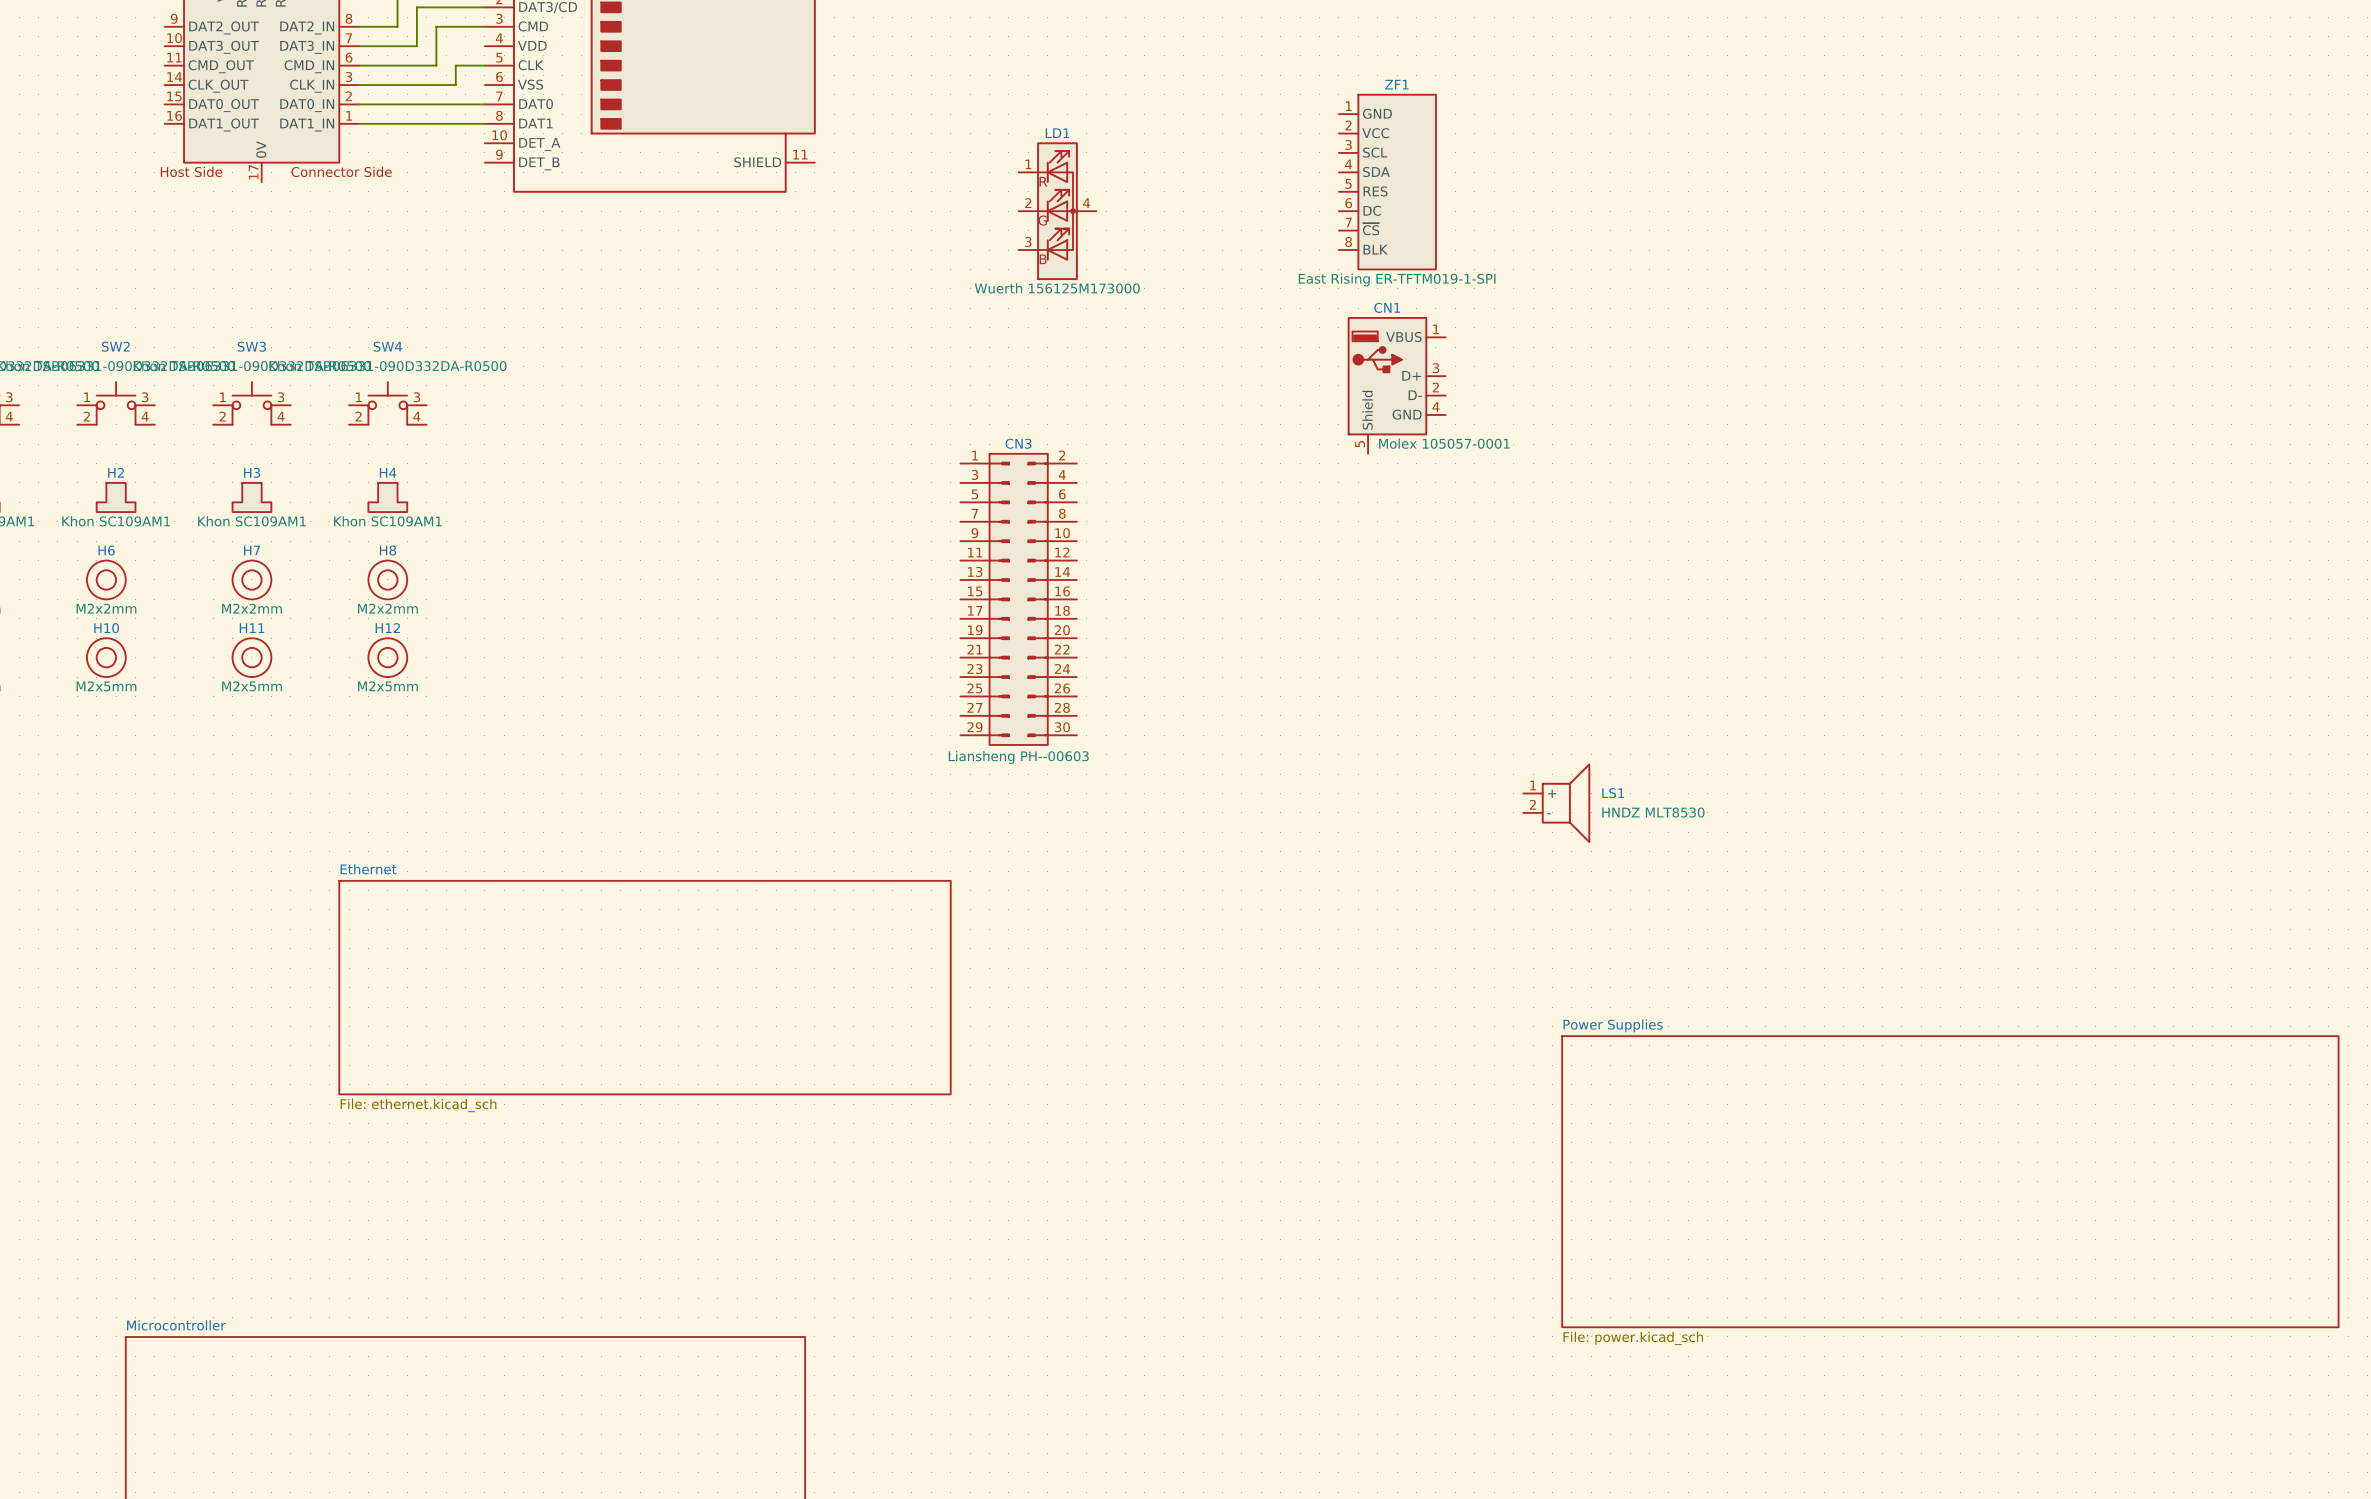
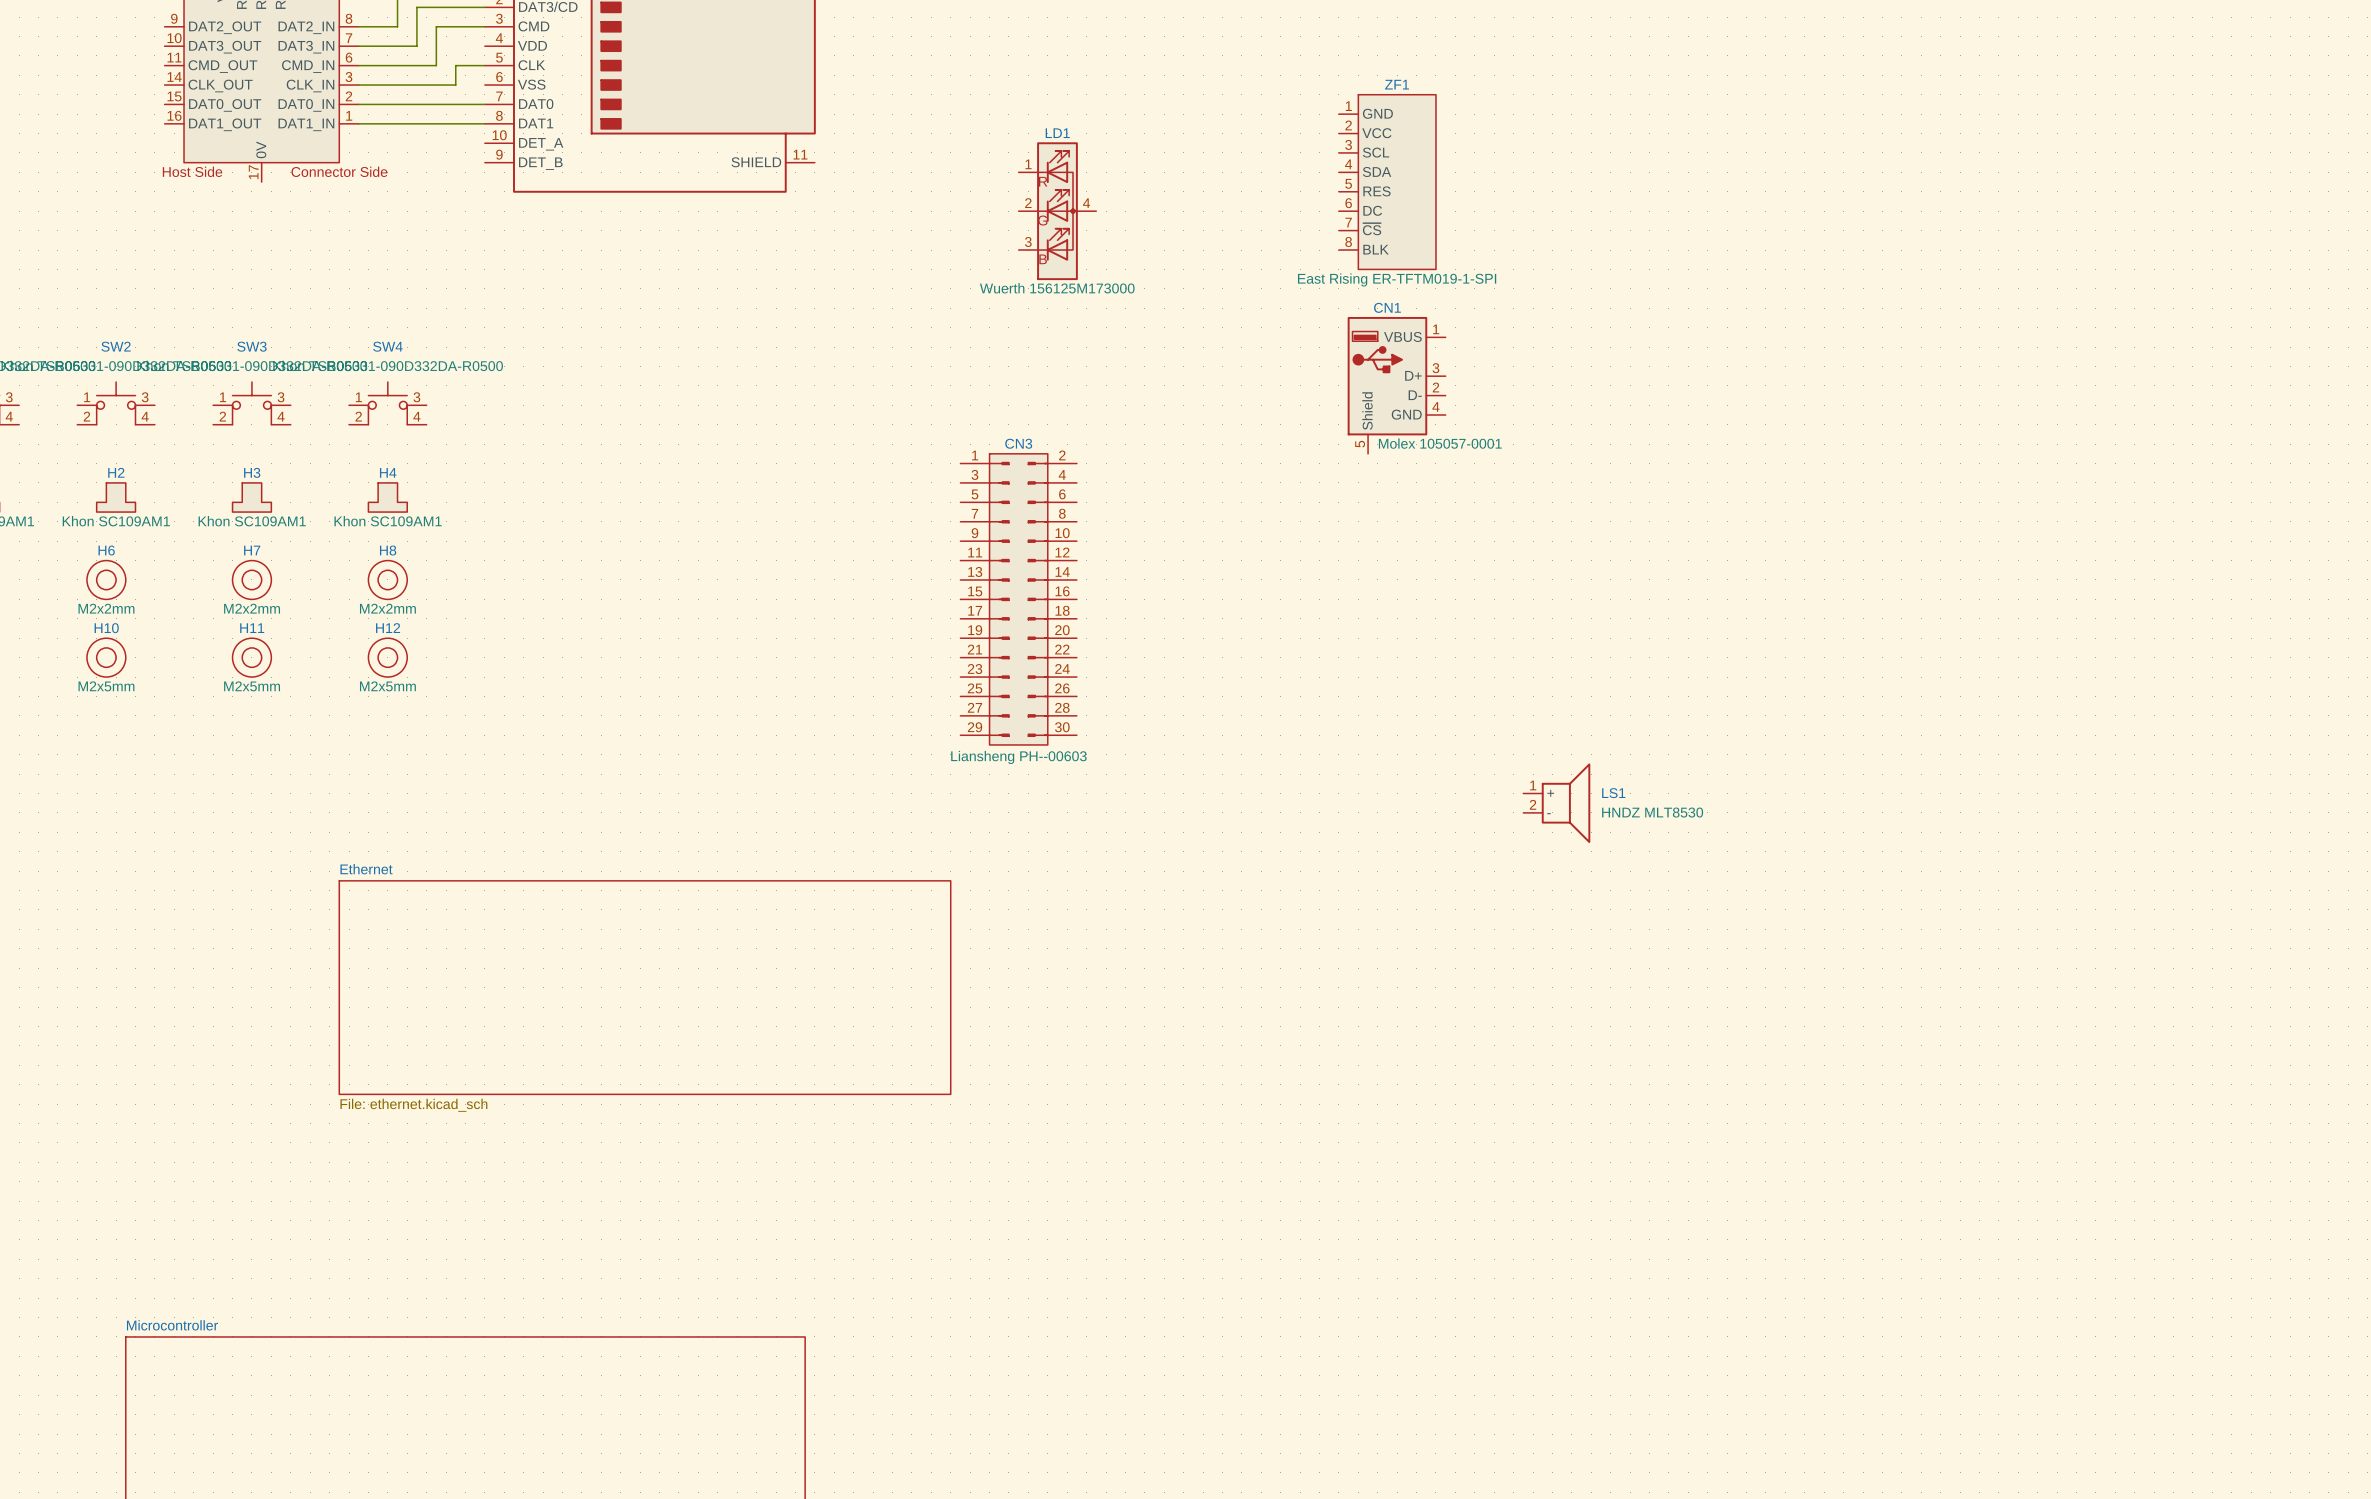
sheet Power Supplies: File: power.kicad_sch (1950, 1181) -> none

